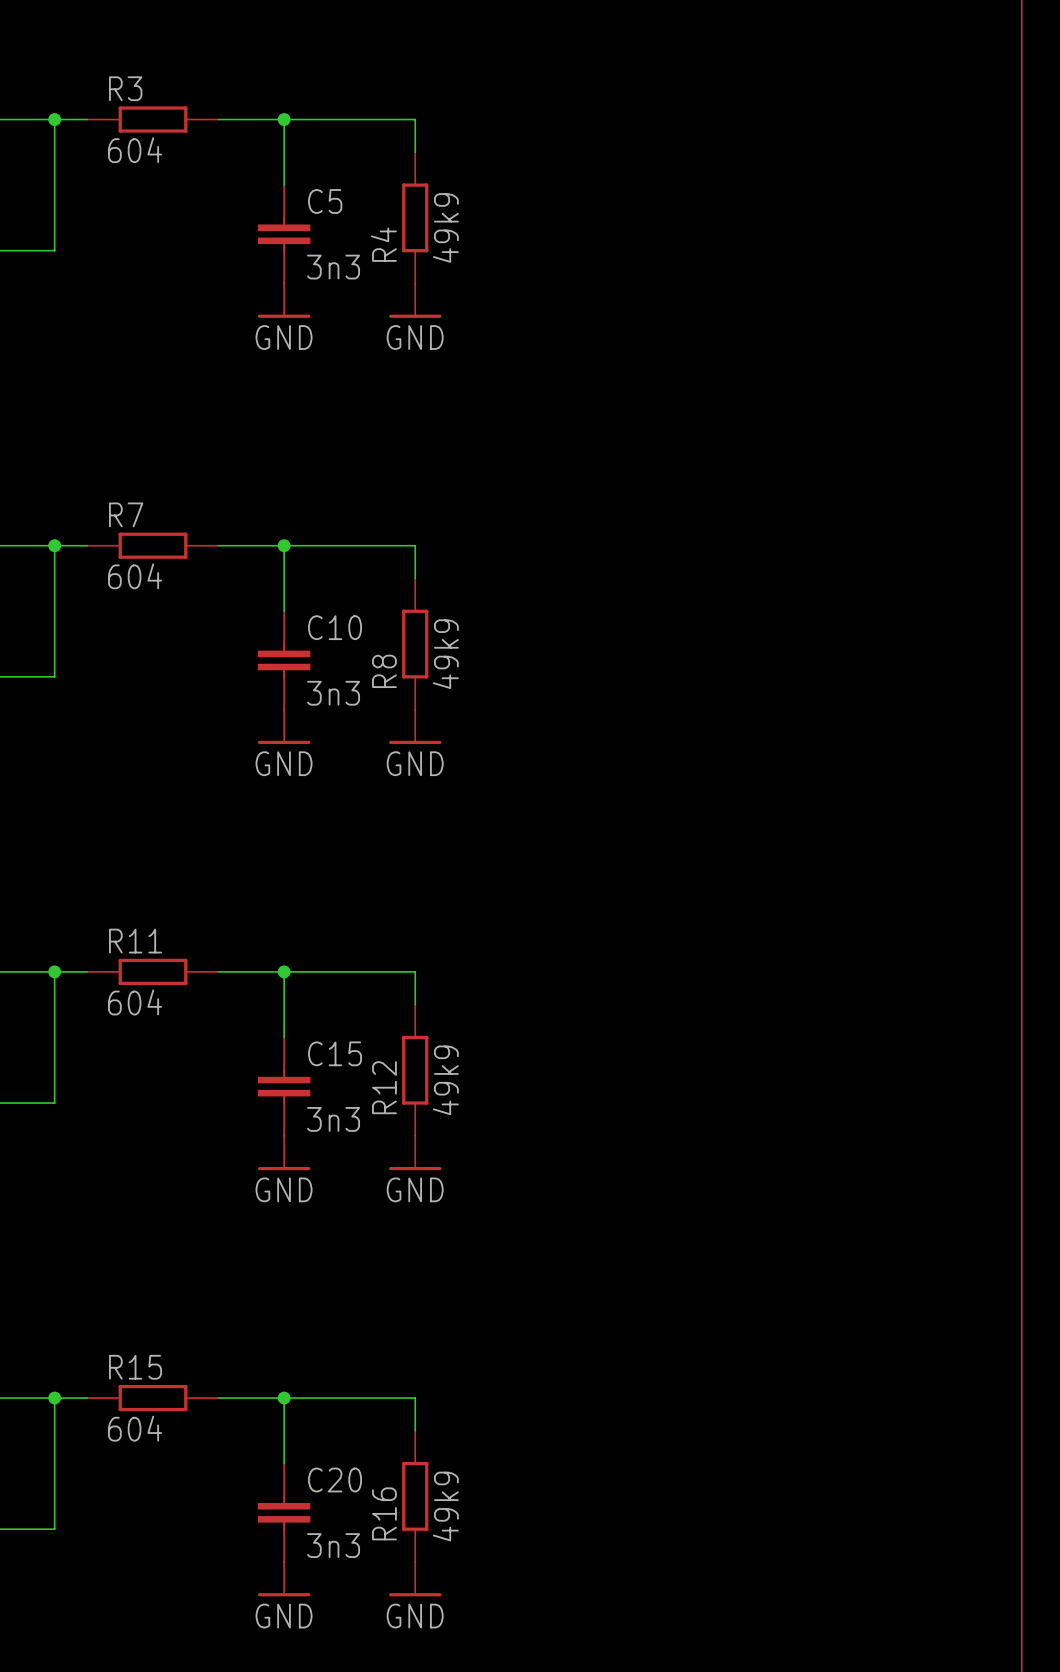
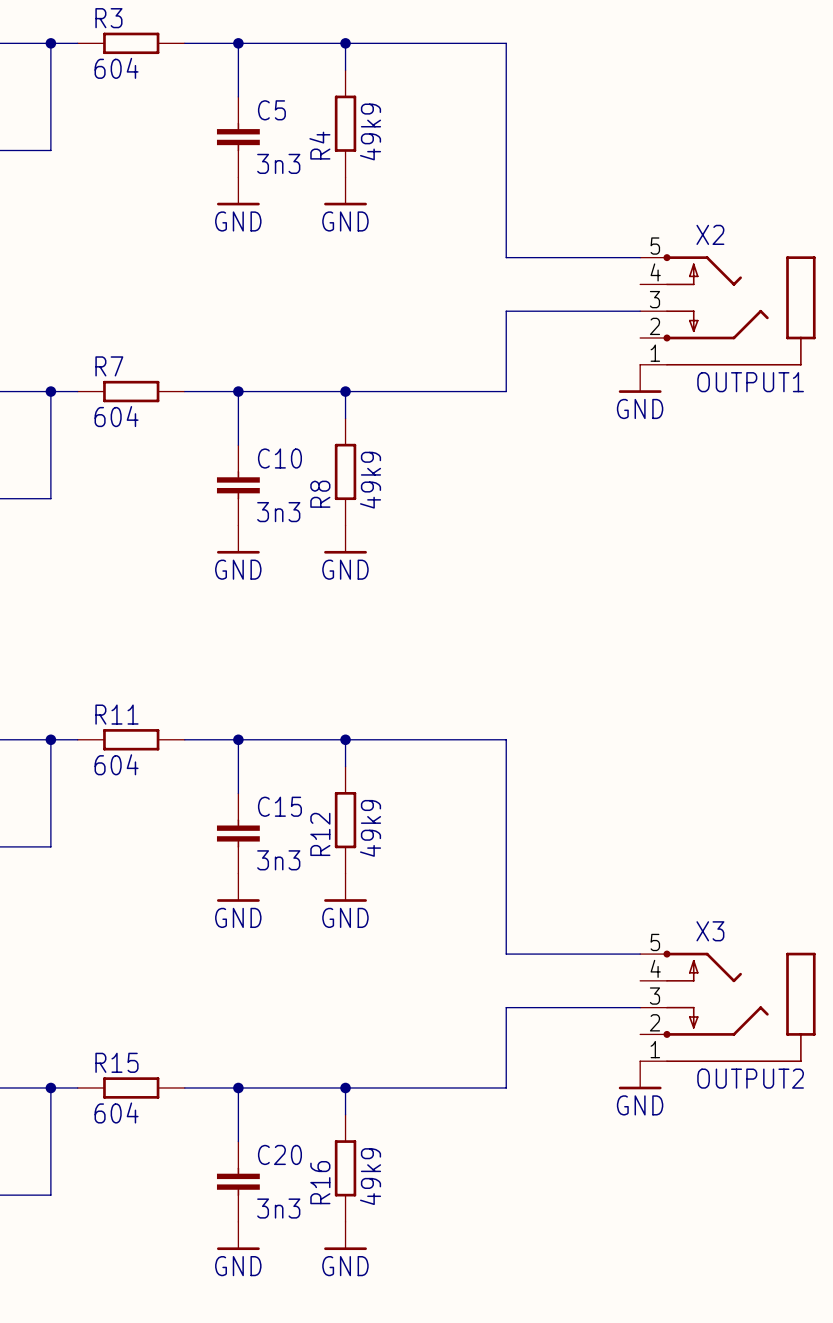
wire: none -> (345, 43) (506, 43) (506, 257) (640, 257)
junction: none -> (345, 43)
X2: none -> OUTPUT1 (727, 309)
wire: none -> (640, 311) (506, 311) (506, 391) (345, 391)
power symbol: none -> GND (640, 378)
junction: none -> (345, 391)
wire: none -> (345, 739) (506, 739) (506, 954) (640, 954)
junction: none -> (345, 739)
X3: none -> OUTPUT2 (727, 1006)
wire: none -> (640, 1007) (506, 1007) (506, 1087) (345, 1087)
power symbol: none -> GND (640, 1075)
junction: none -> (345, 1087)

